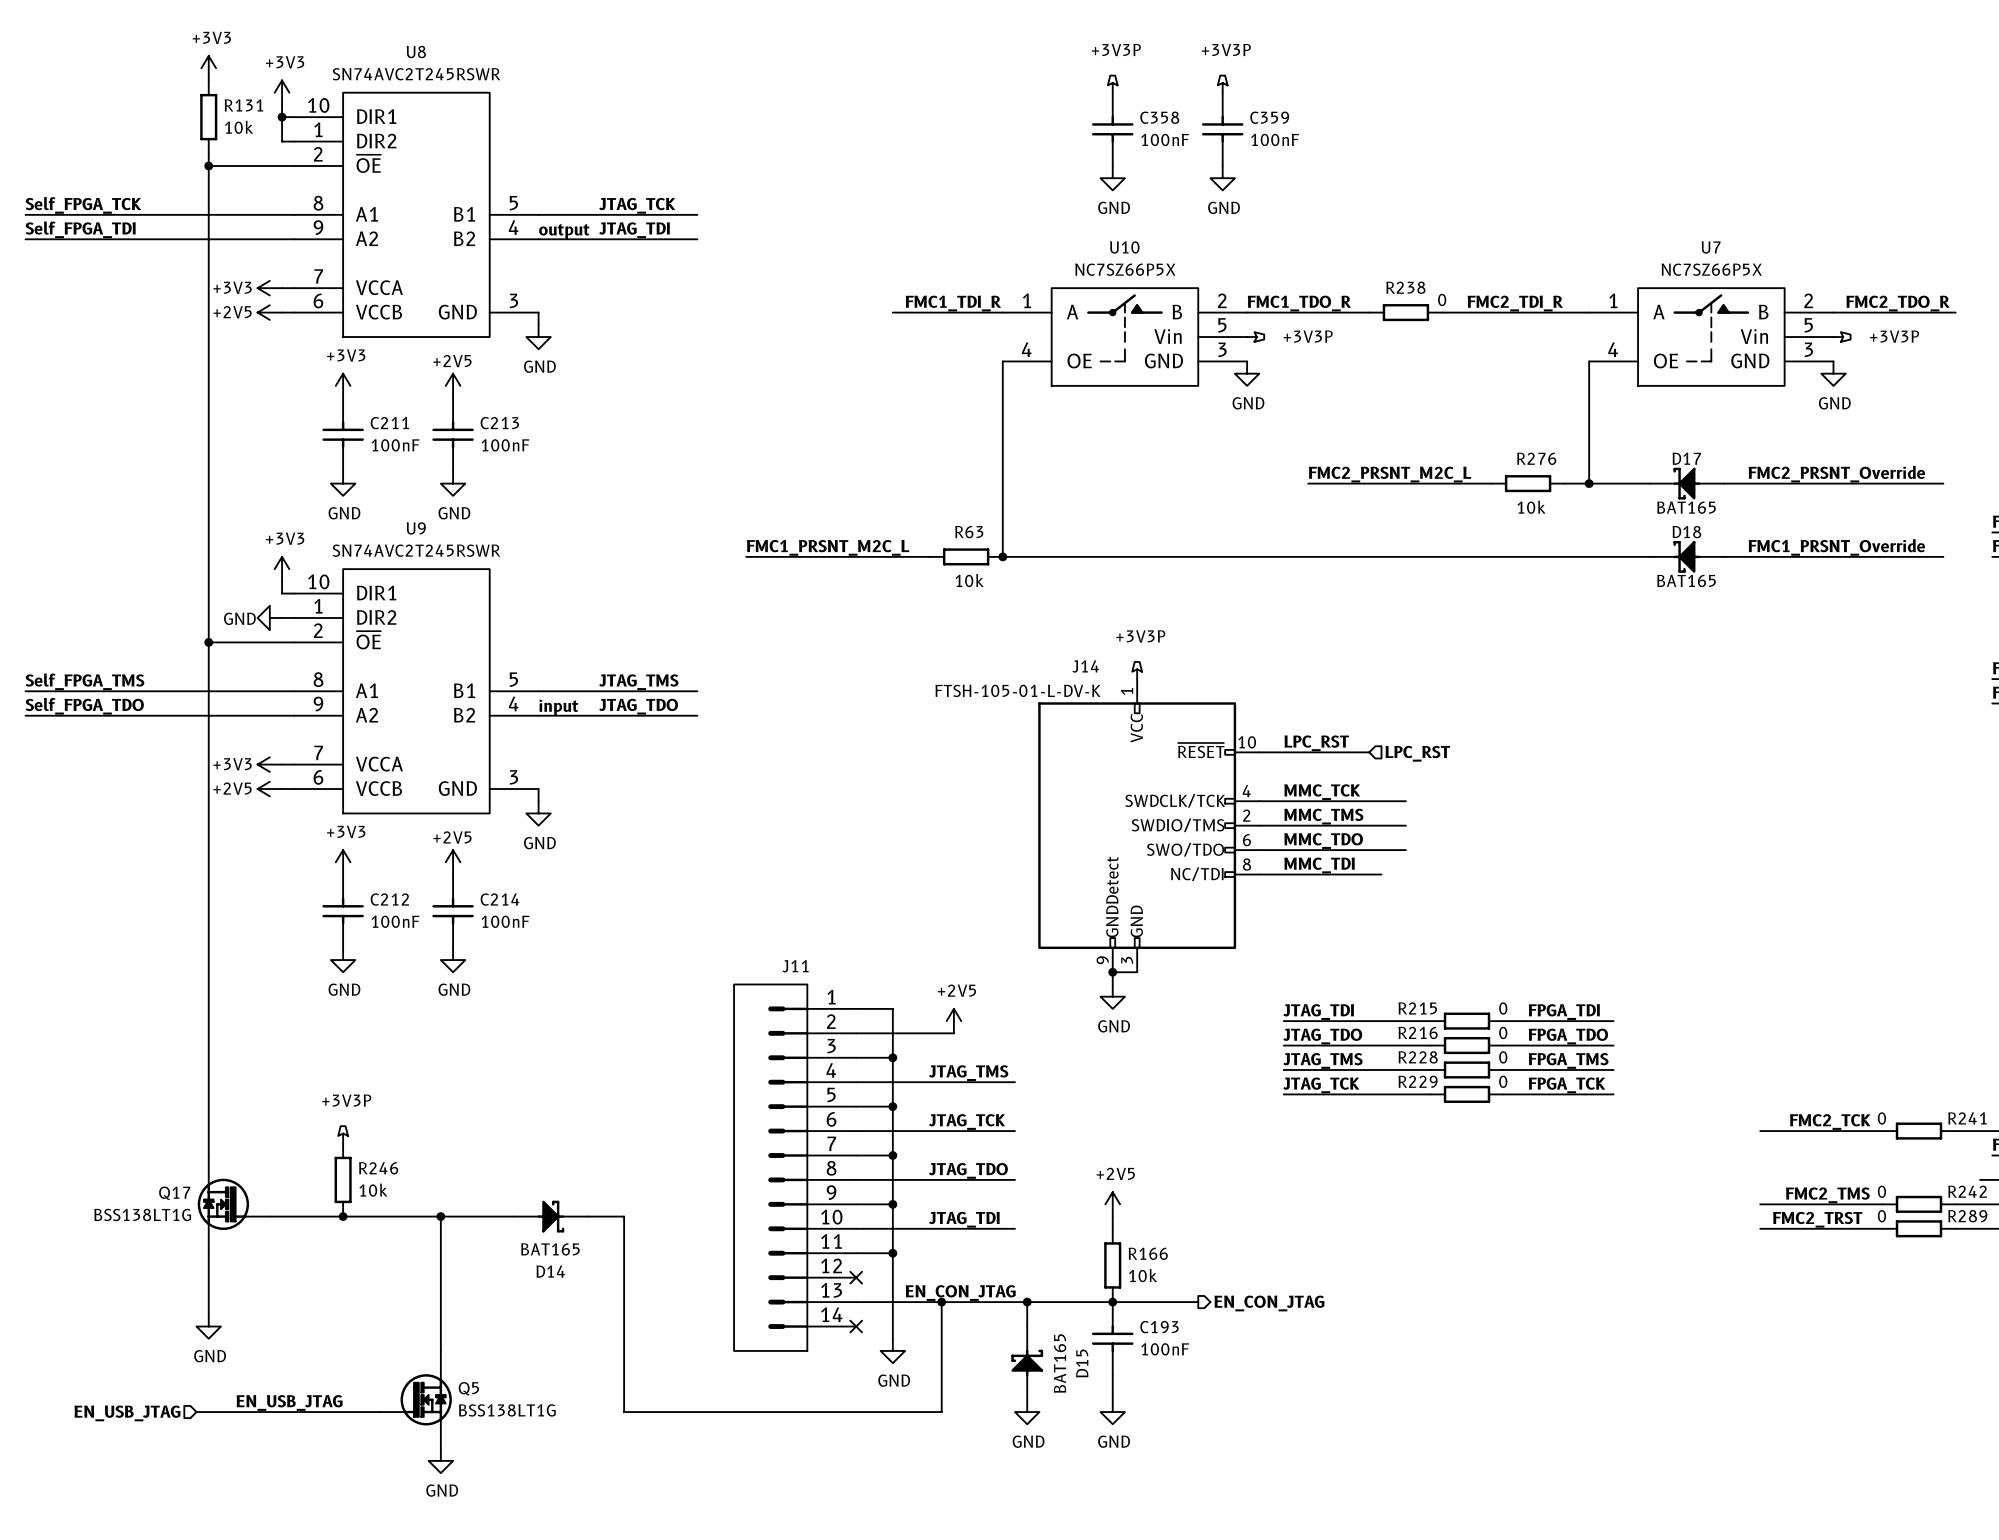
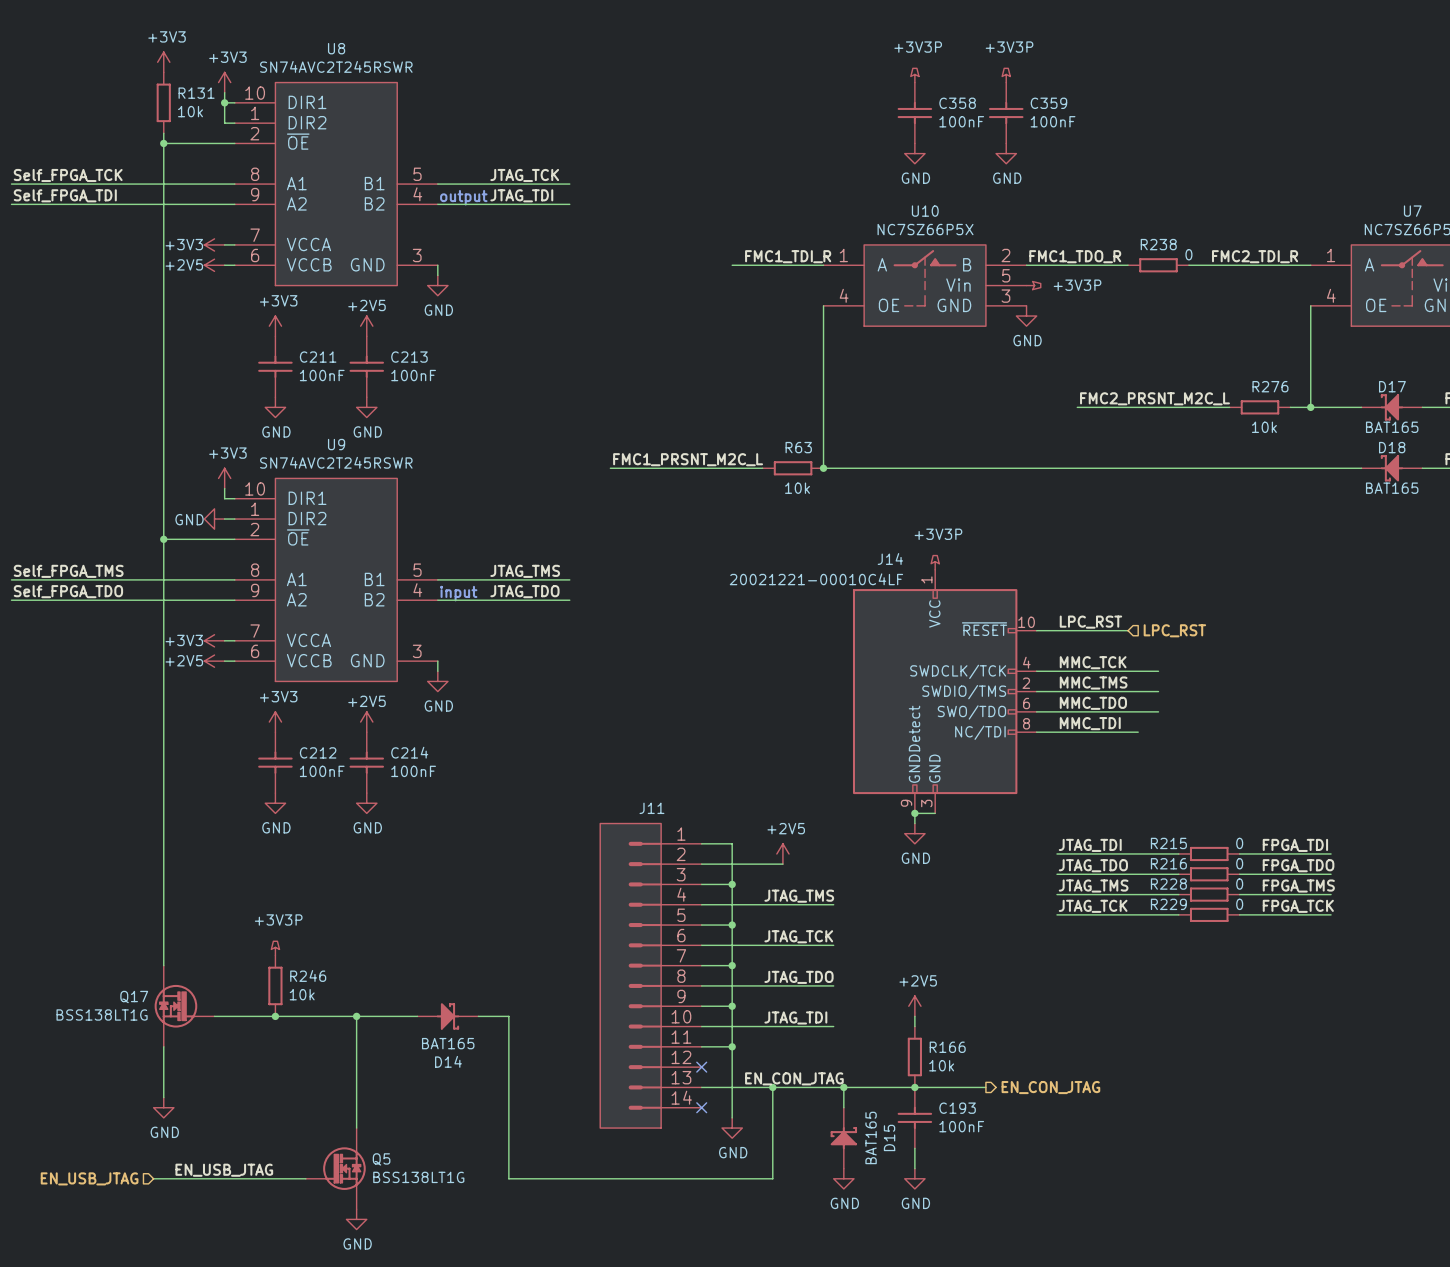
J14 value: FTSH-105-01-L-DV-K (1017, 690) -> 20021221-00010C4LF (816, 579)

